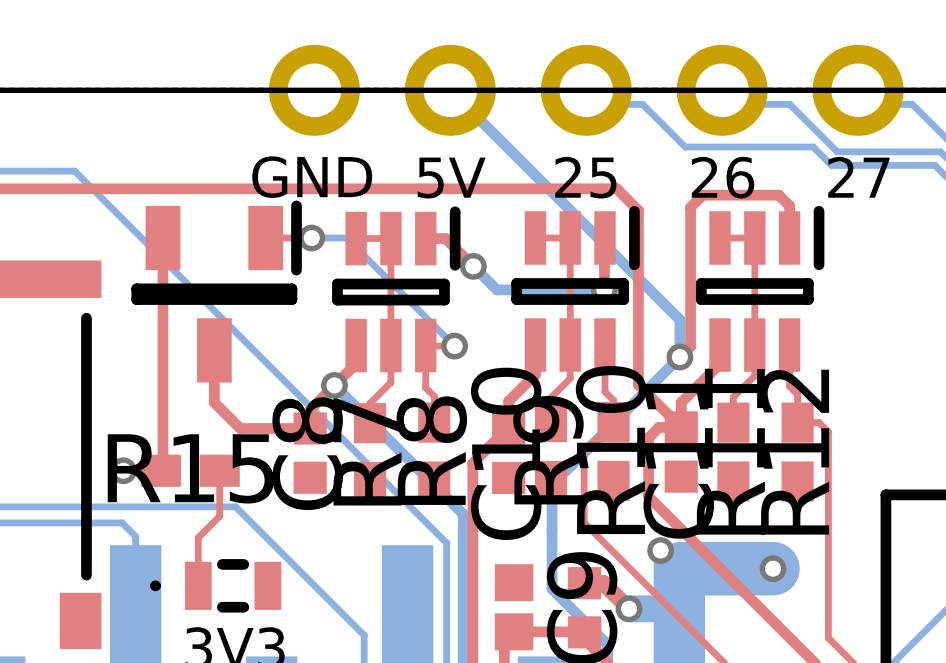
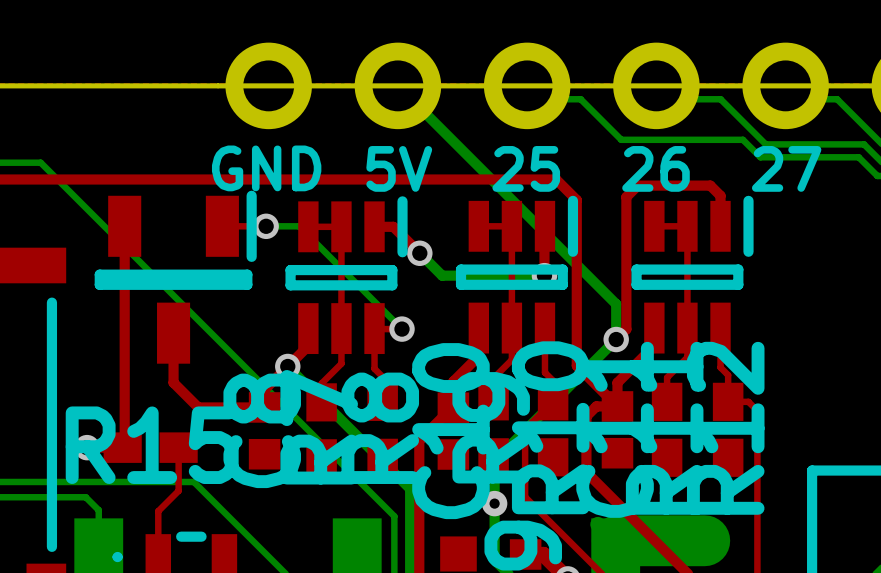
via: none -> (494, 503)
via: (660, 550) -> none
via: (773, 568) -> none

